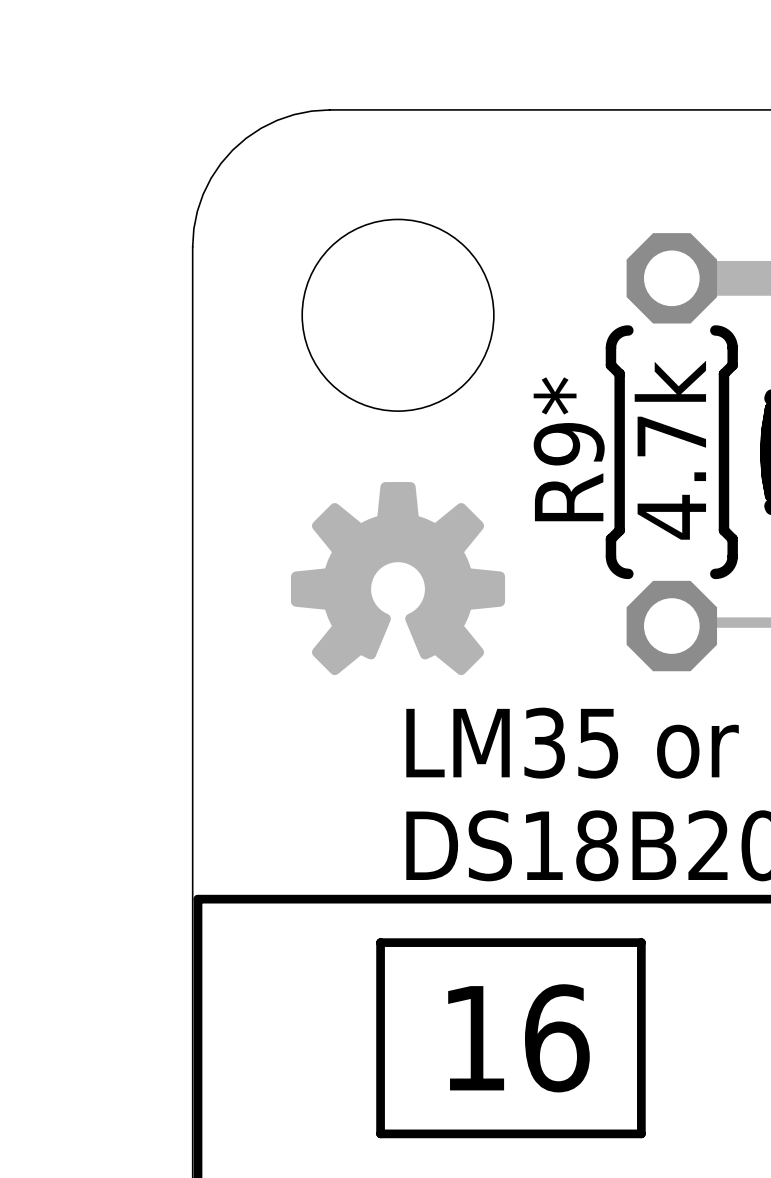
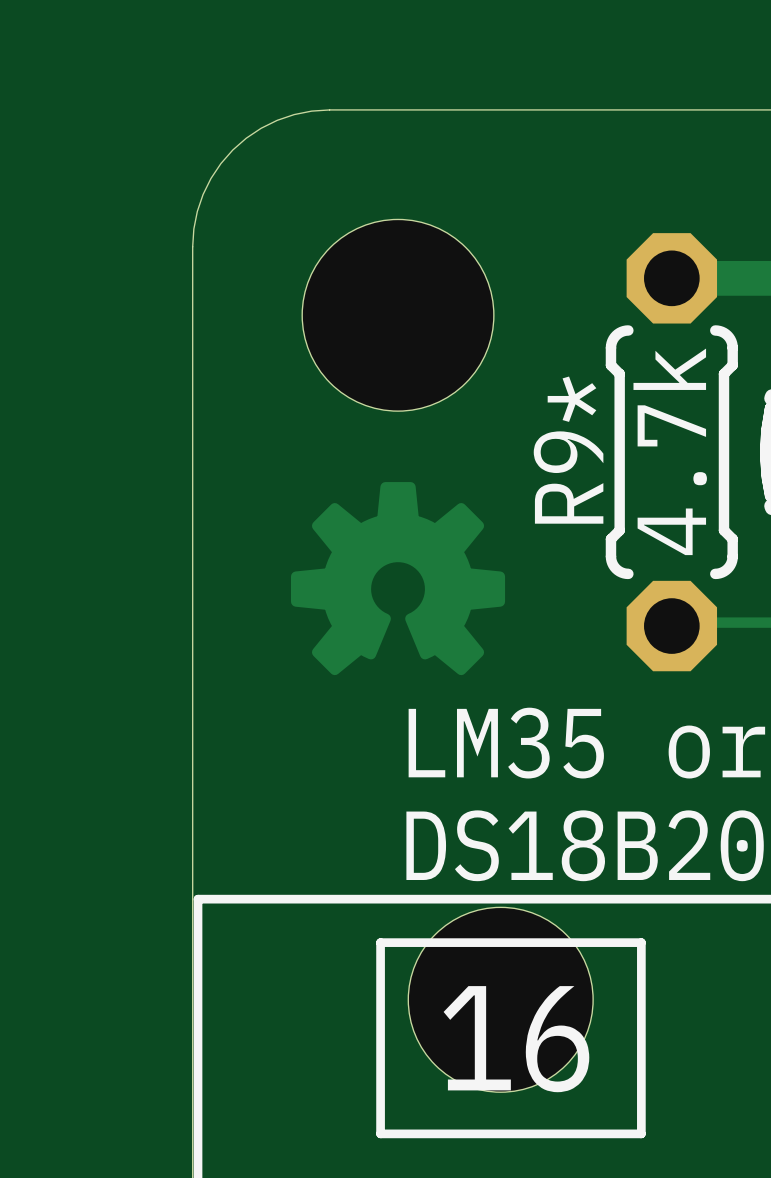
hole: none -> (500, 999)

